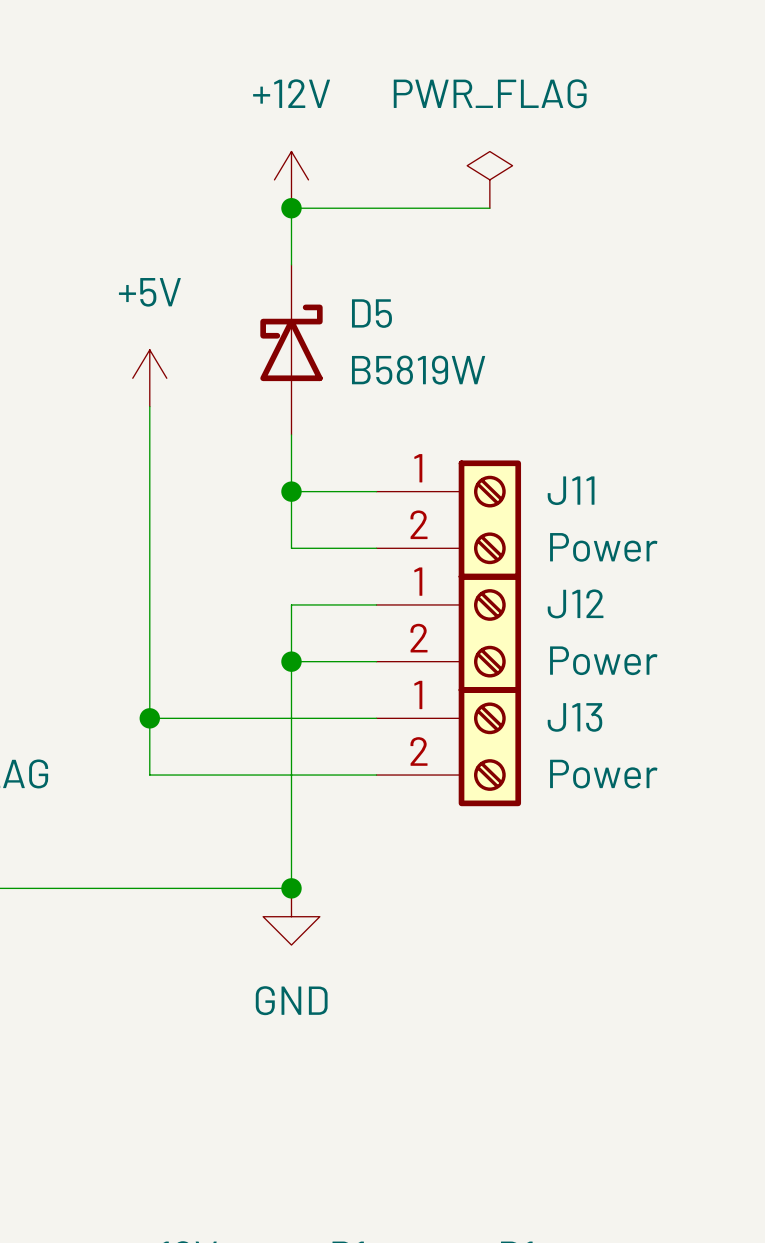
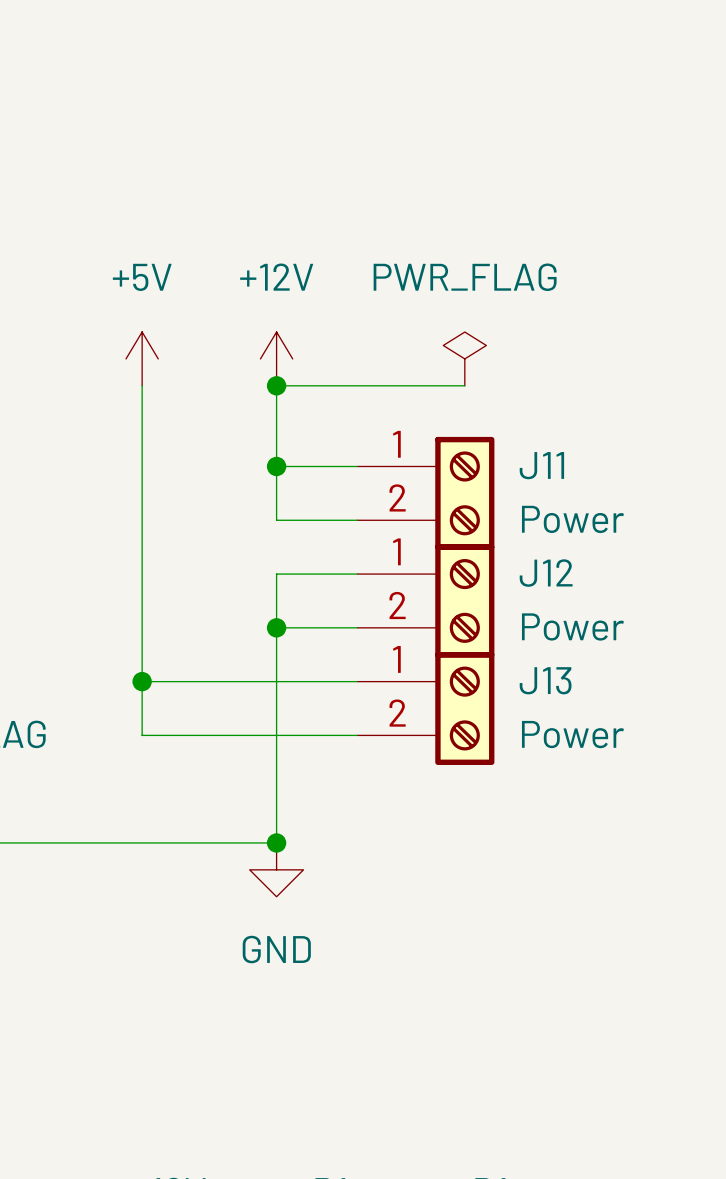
power symbol position: +12V (291, 179) -> +12V (276, 358)
power symbol position: PWR_FLAG (489, 179) -> PWR_FLAG (464, 358)
junction: (291, 208) -> none
wire: (489, 208) (291, 208) (291, 264) -> none
D5: B5819W (291, 349) -> none
junction: none -> (276, 385)
wire: none -> (464, 385) (276, 385) (276, 412)

